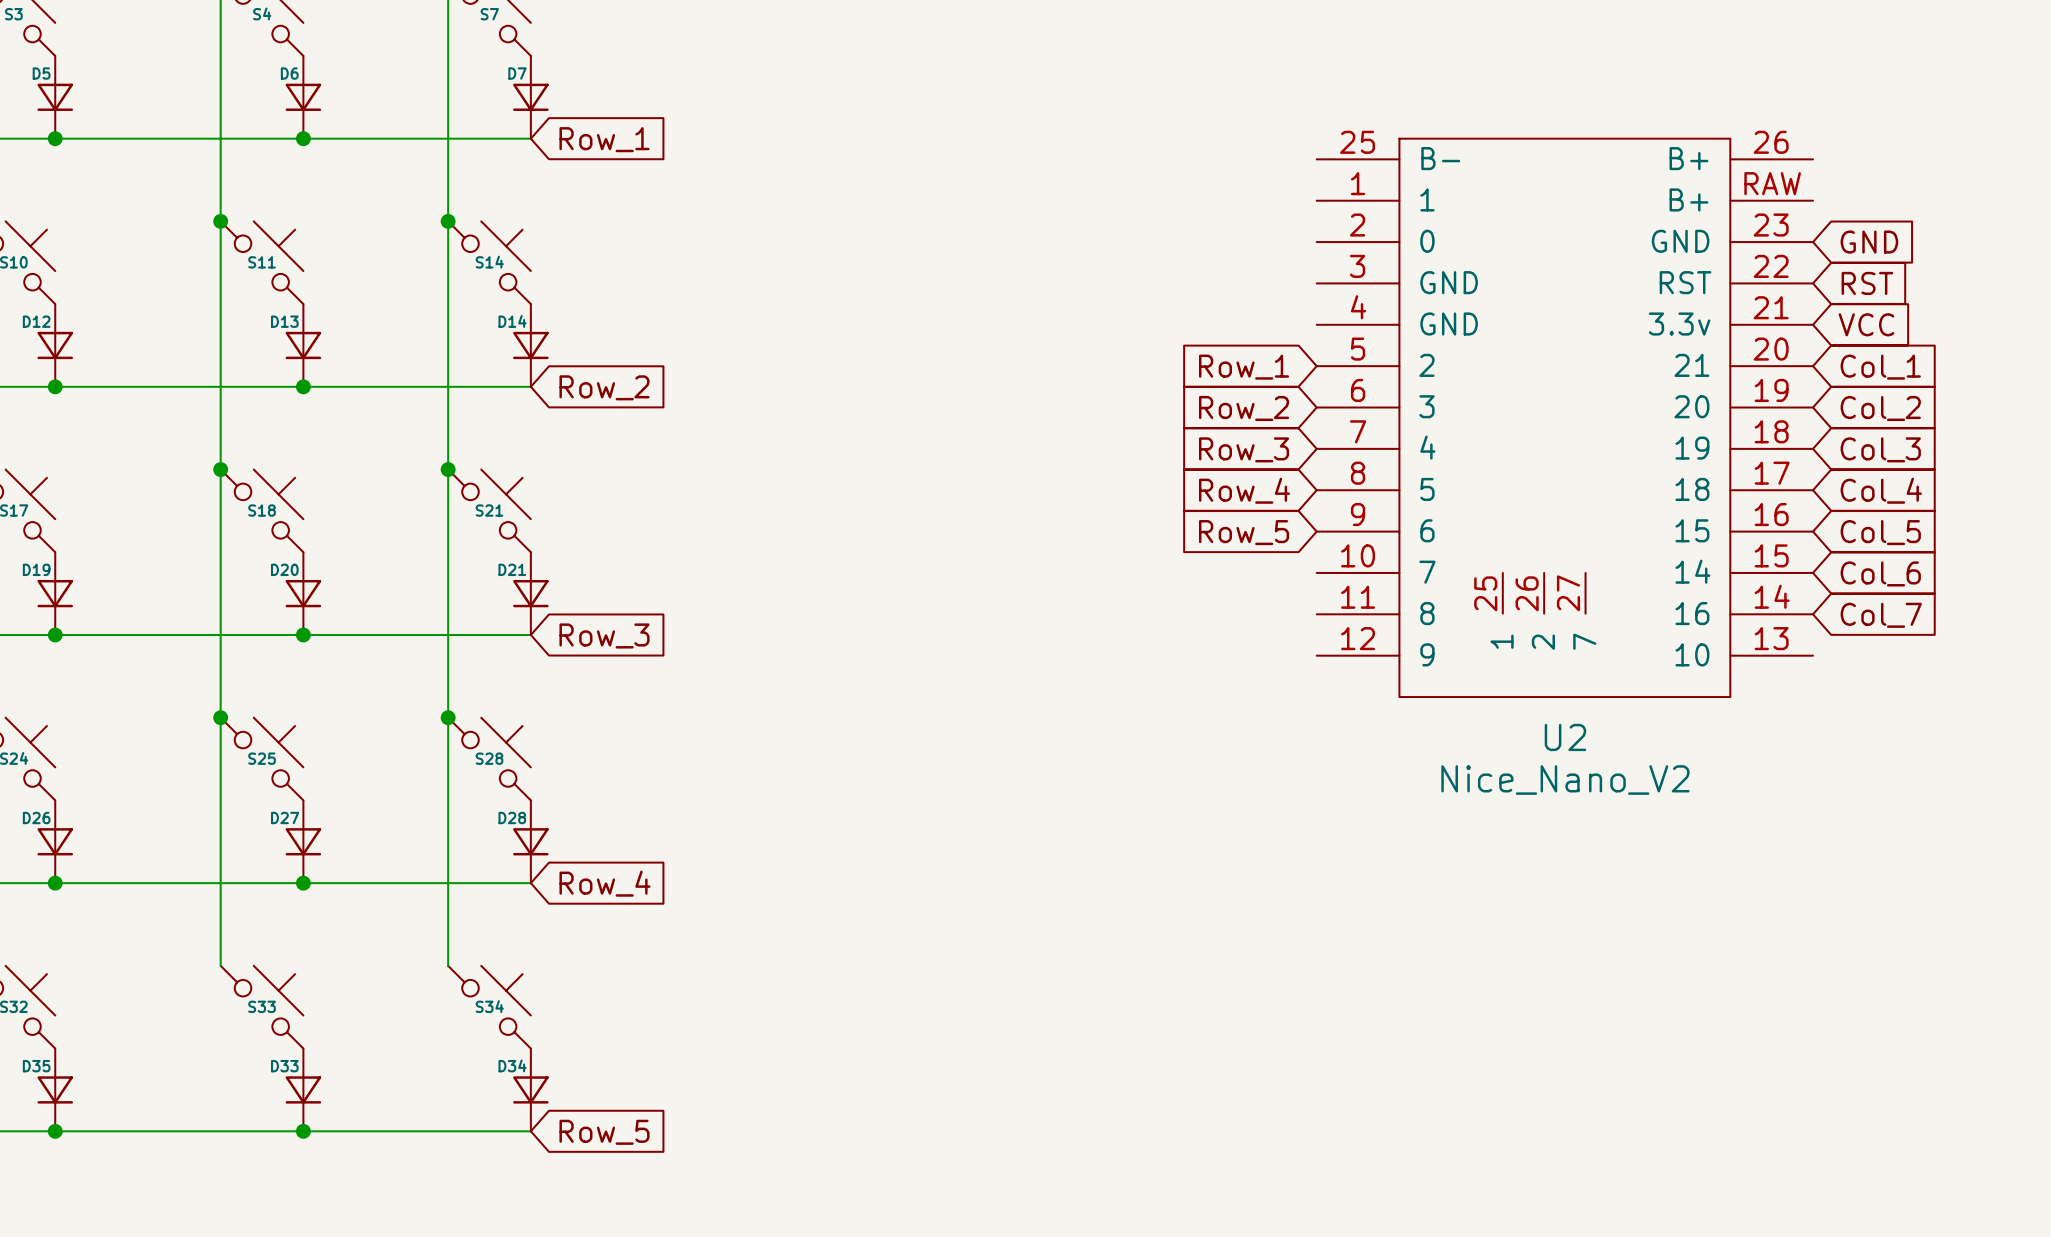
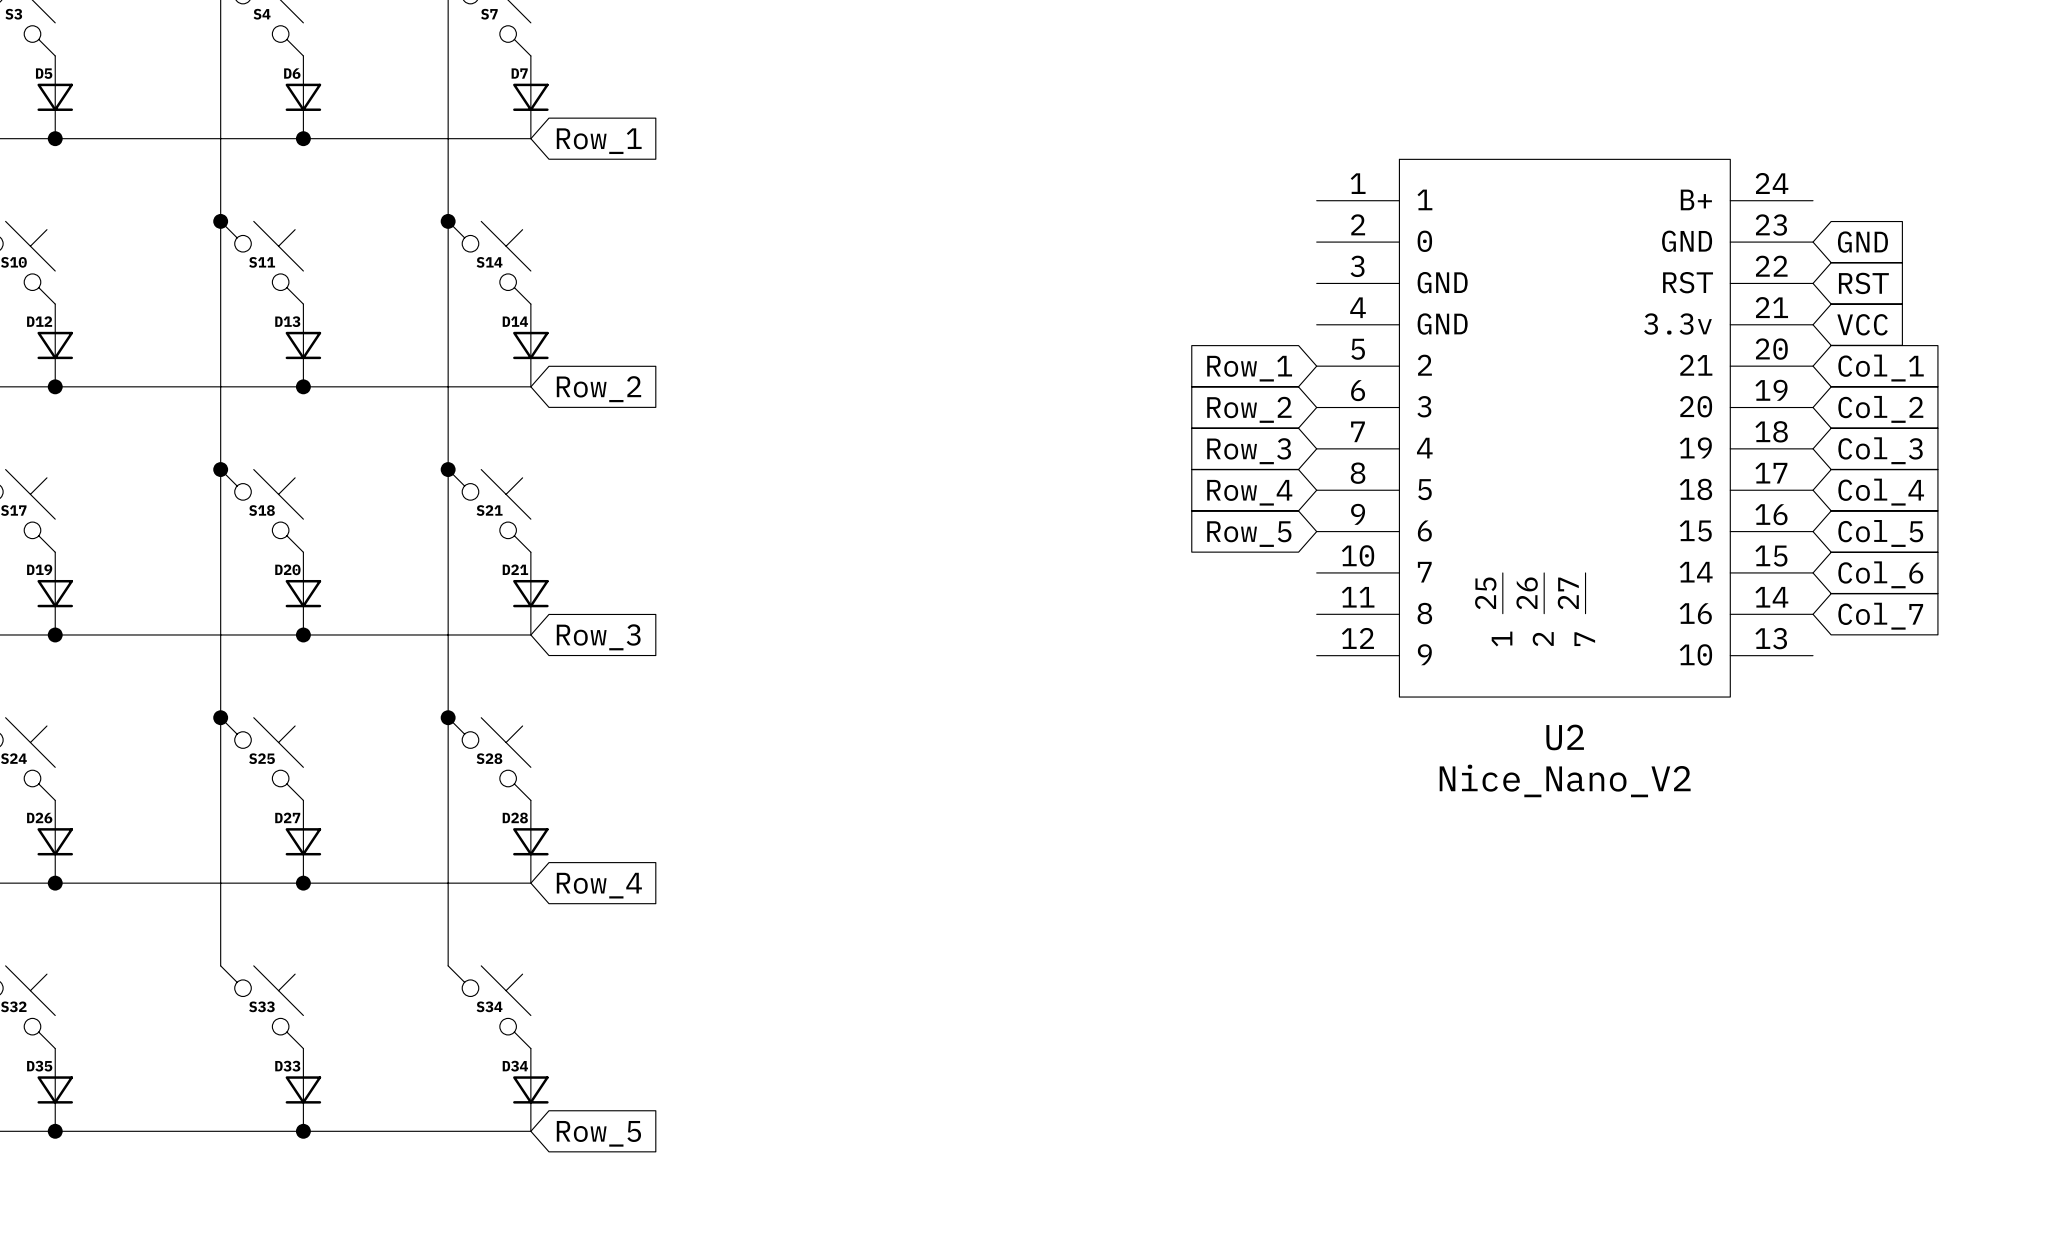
U2 symbol: [1316, 138, 1814, 698] -> [1316, 159, 1814, 698]

